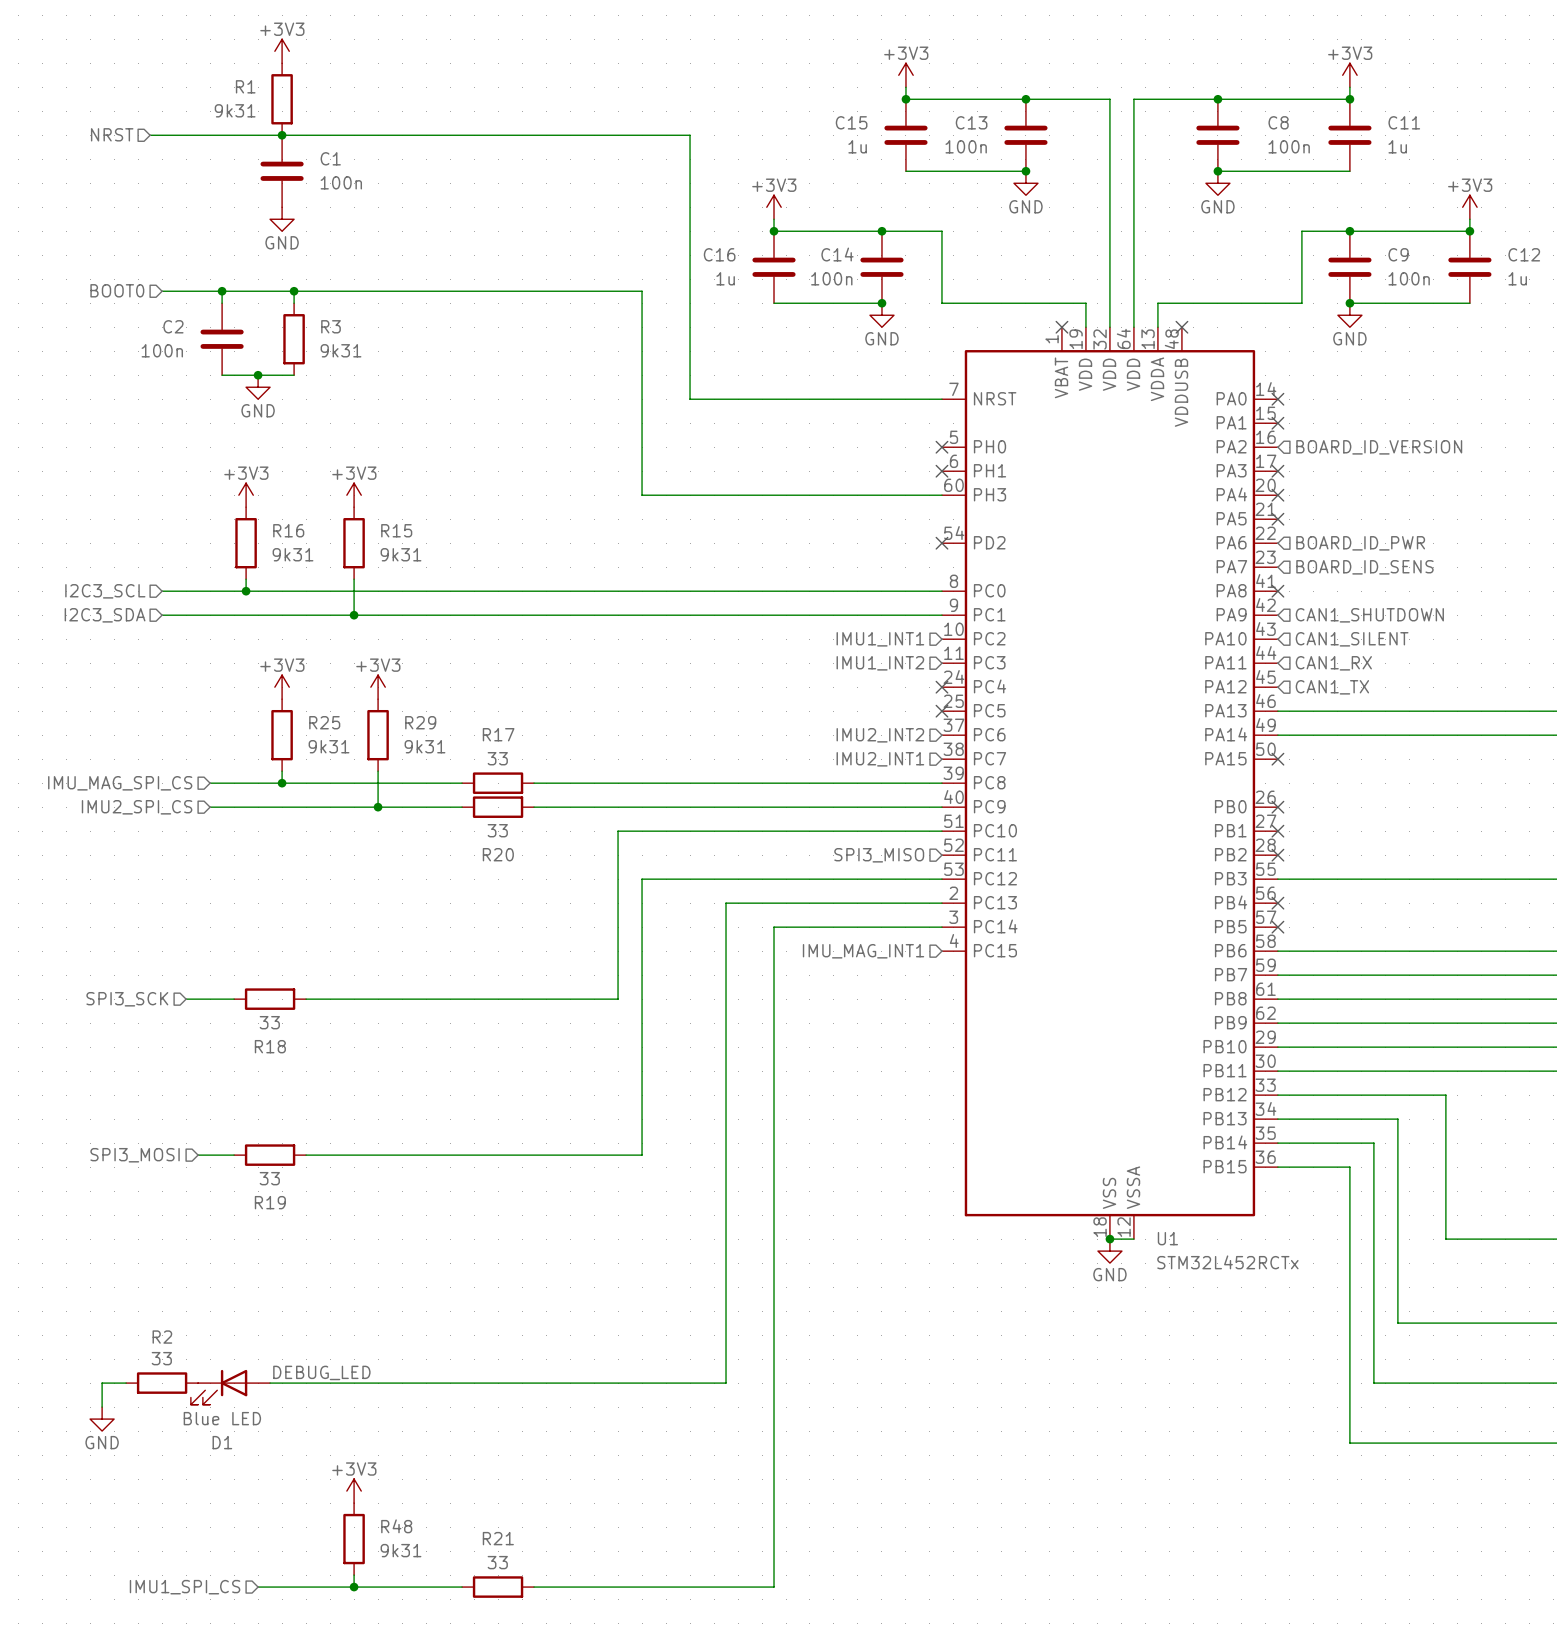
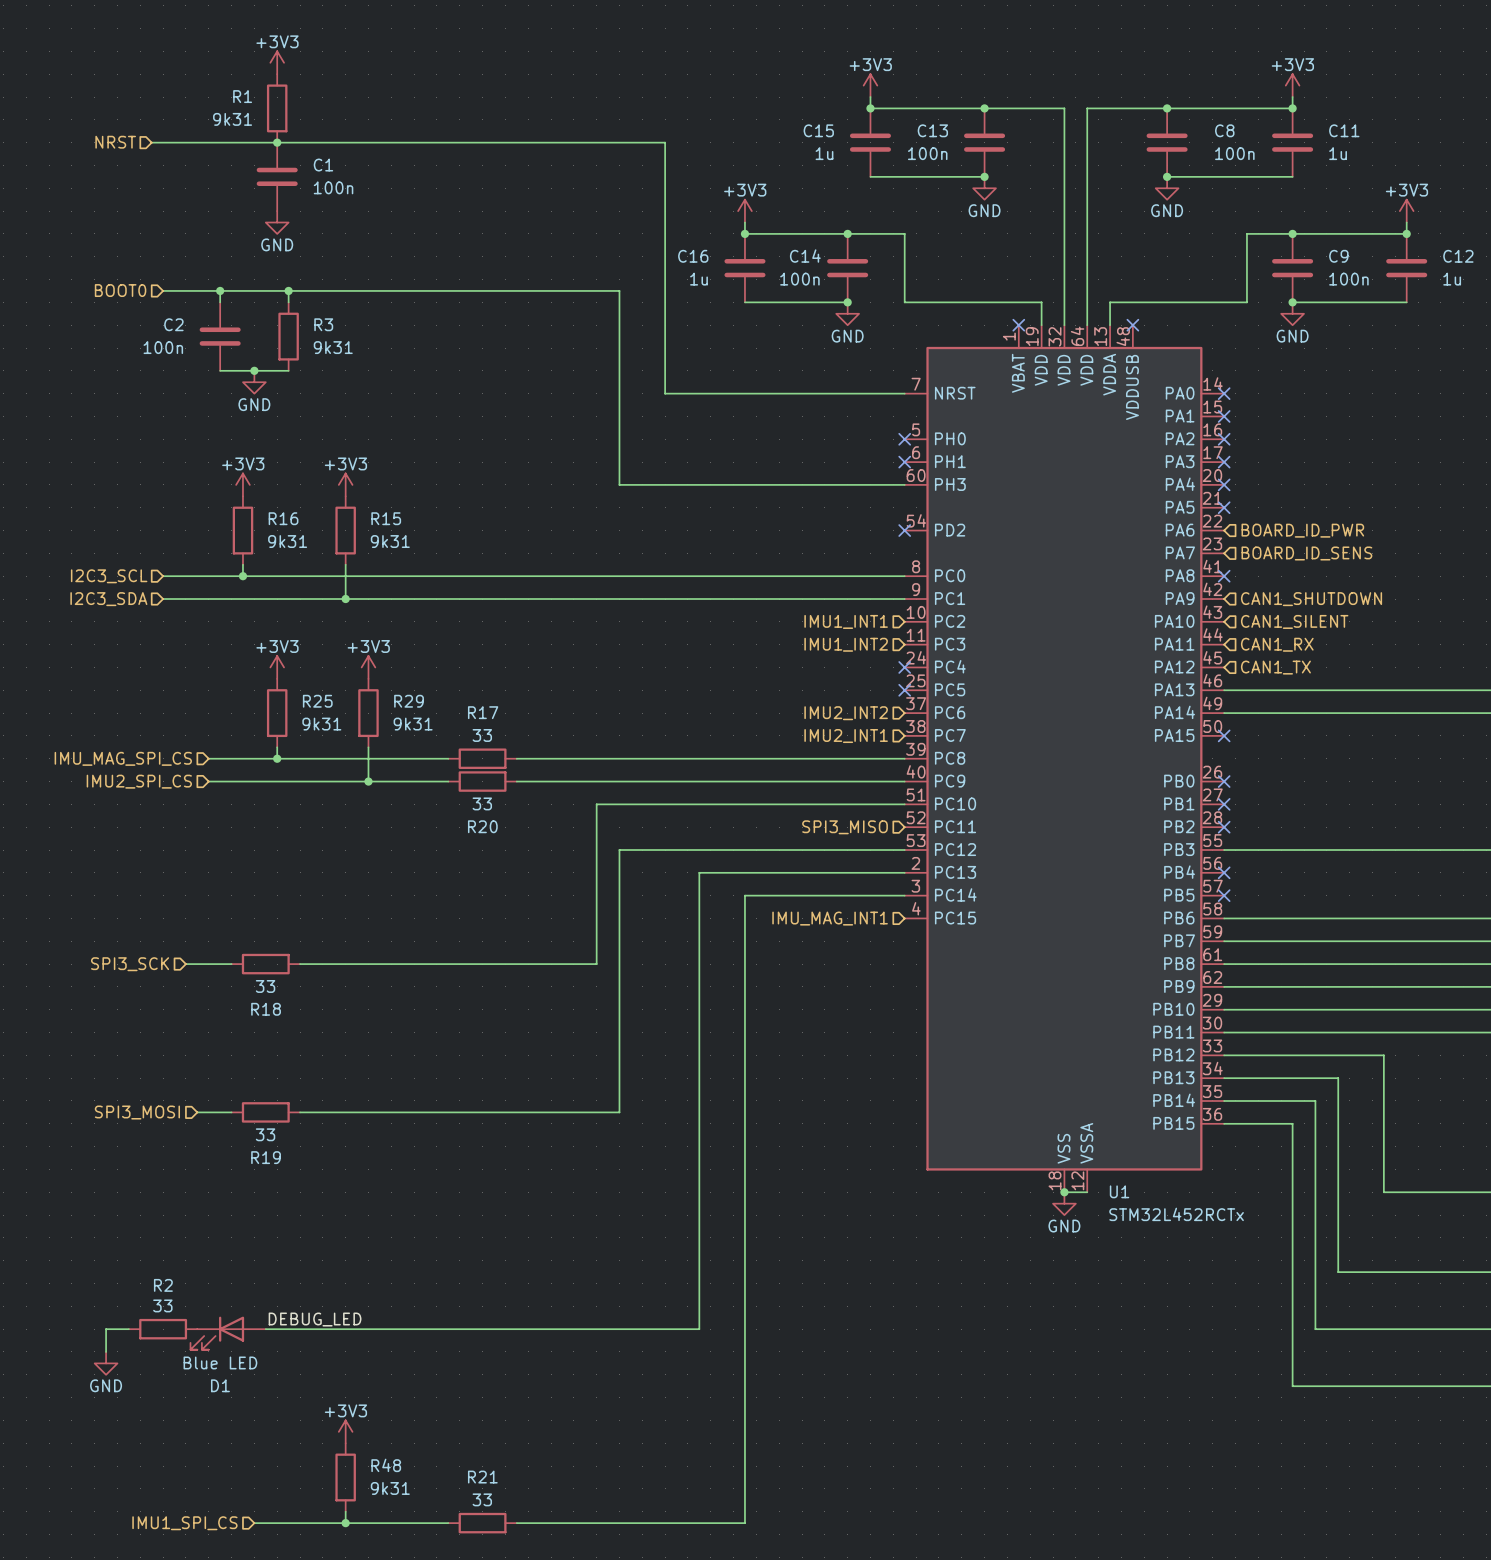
no-connect mark: none -> (1224, 439)
hierarchical label: BOARD_ID_VERSION (1379, 447) -> none

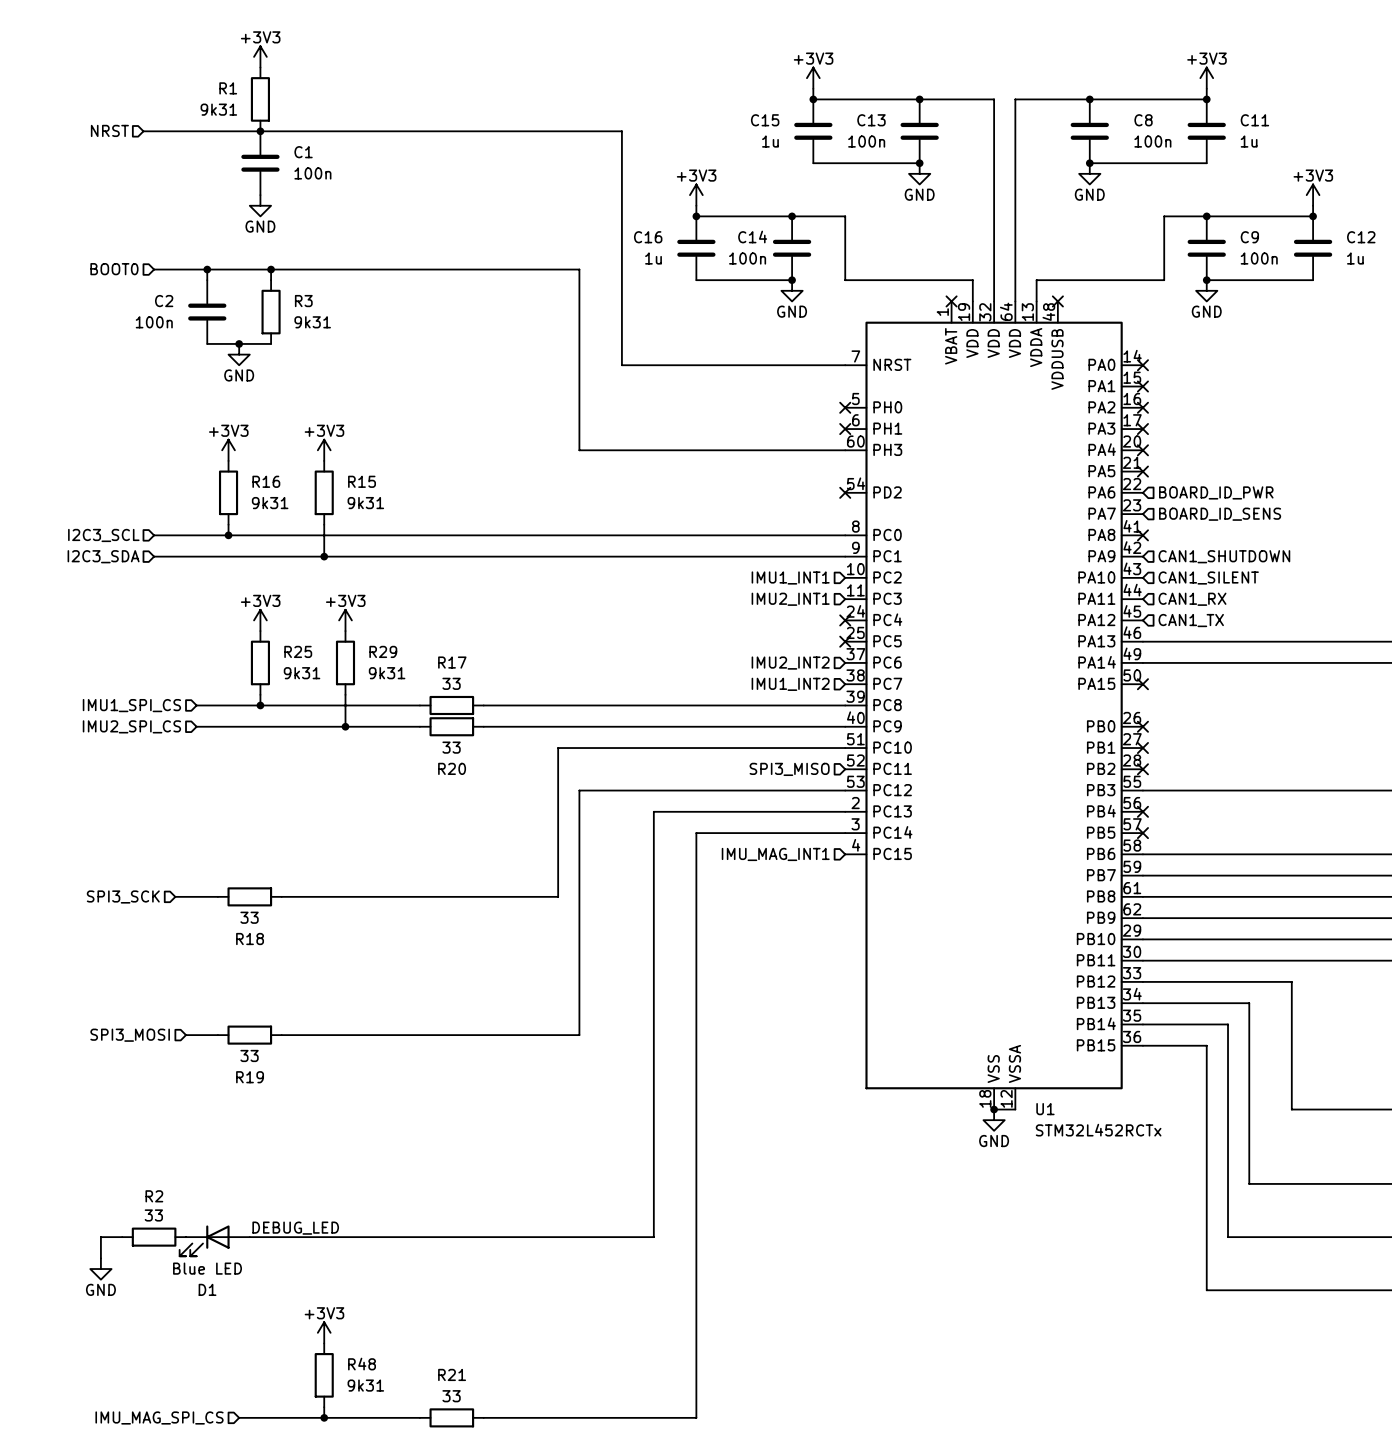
hierarchical label: IMU1_INT2 (846, 644) -> IMU2_INT1 (790, 599)
hierarchical label: IMU2_INT1 (846, 736) -> IMU1_INT2 (790, 684)
hierarchical label: IMU_MAG_SPI_CS (123, 758) -> IMU1_SPI_CS (131, 705)
hierarchical label: IMU1_SPI_CS (184, 1523) -> IMU_MAG_SPI_CS (159, 1417)

